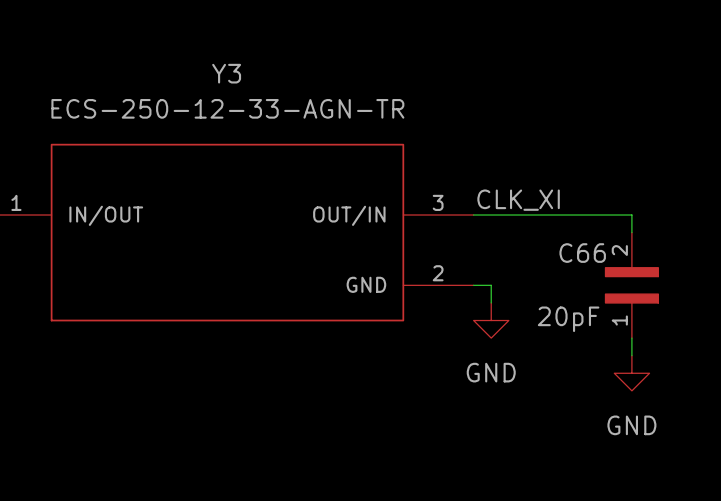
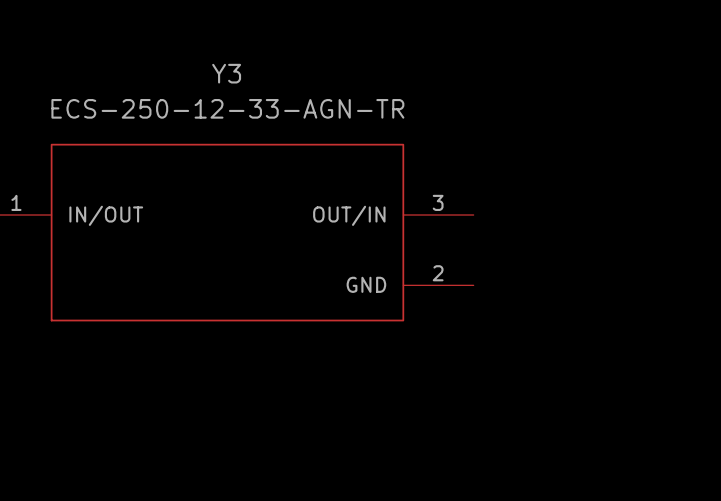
label: CLK_XI (518, 200) -> none
wire: (473, 215) (631, 215) (631, 232) -> none
wire: (473, 285) (491, 285) (491, 302) -> none
C66: 20pF (631, 285) -> none
power symbol: GND (491, 320) -> none
wire: (631, 338) (631, 355) -> none
power symbol: GND (631, 373) -> none

